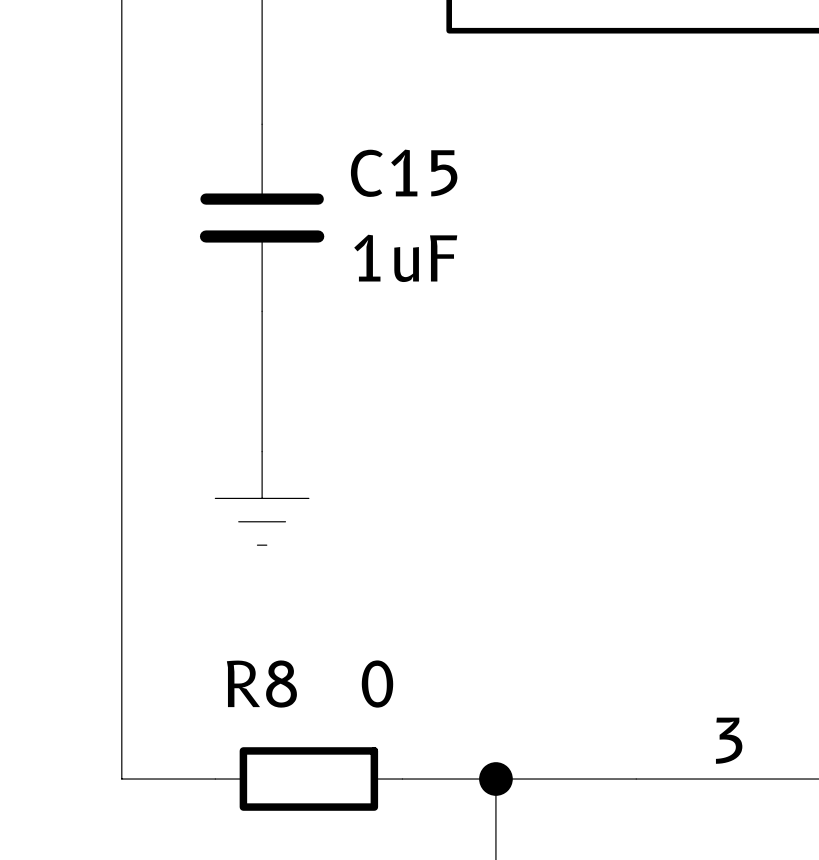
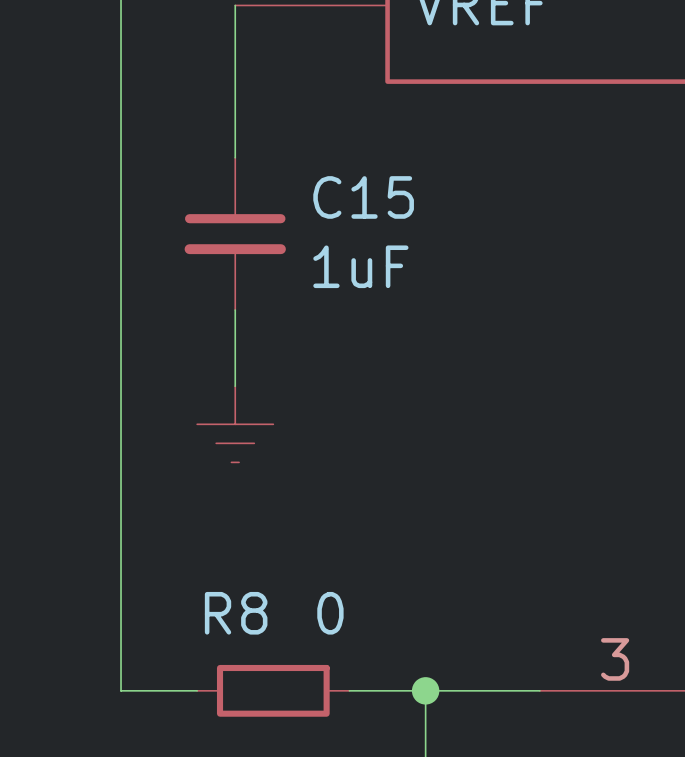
power symbol position: (262, 498) -> (235, 424)

